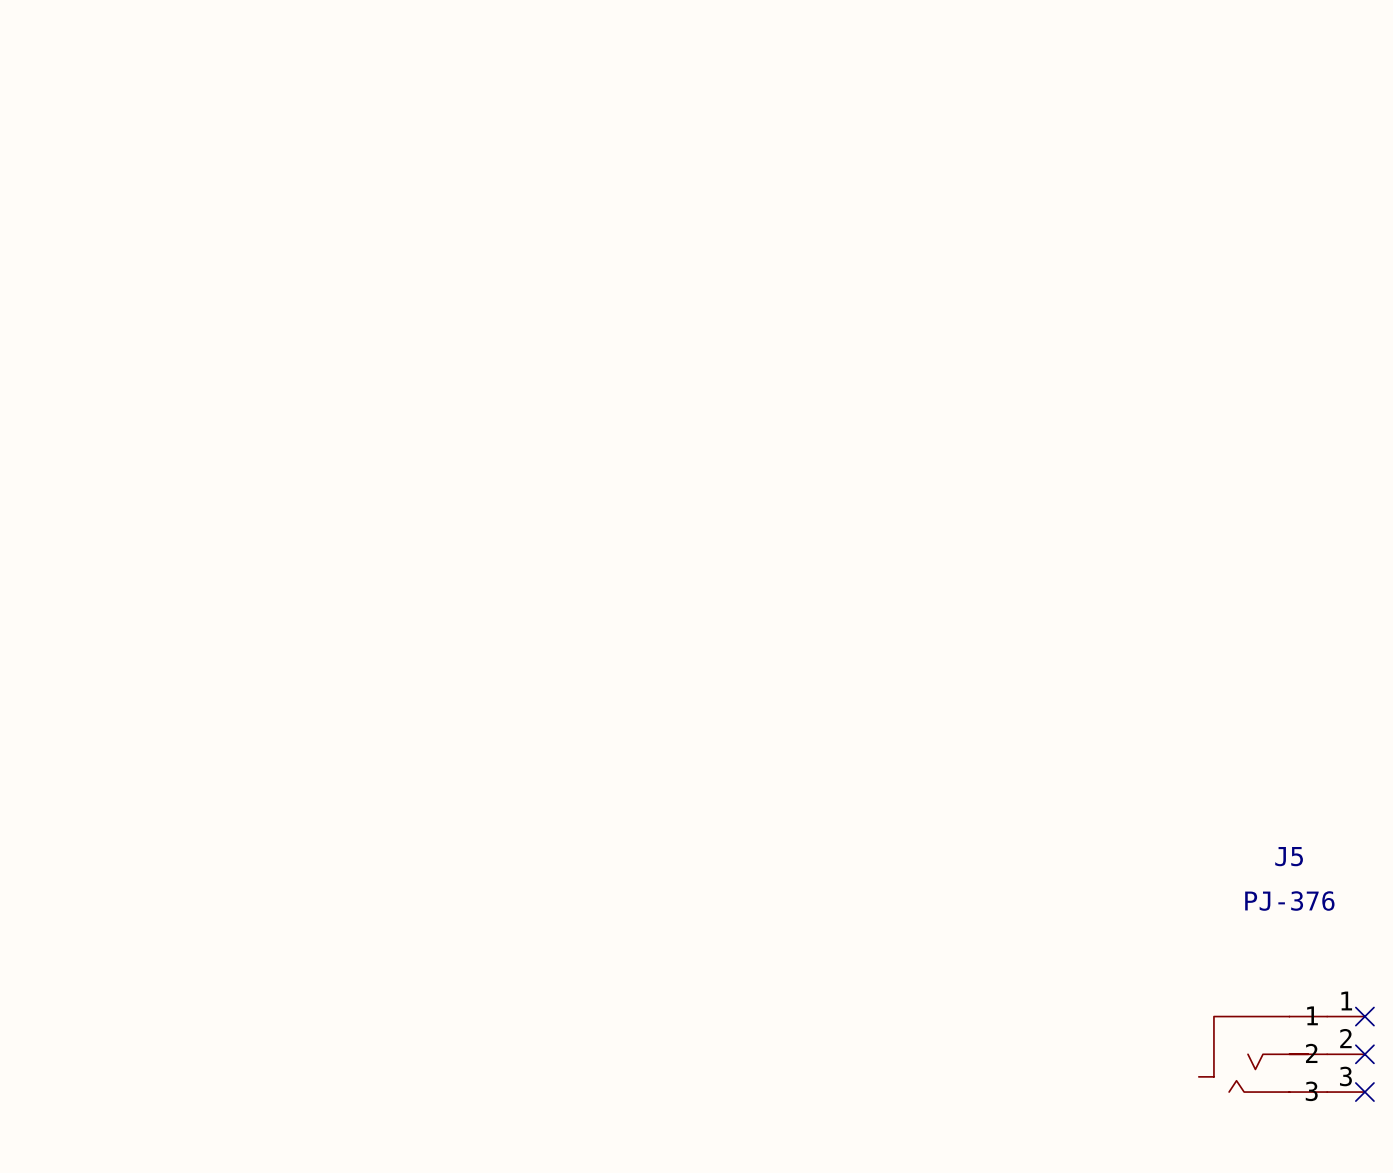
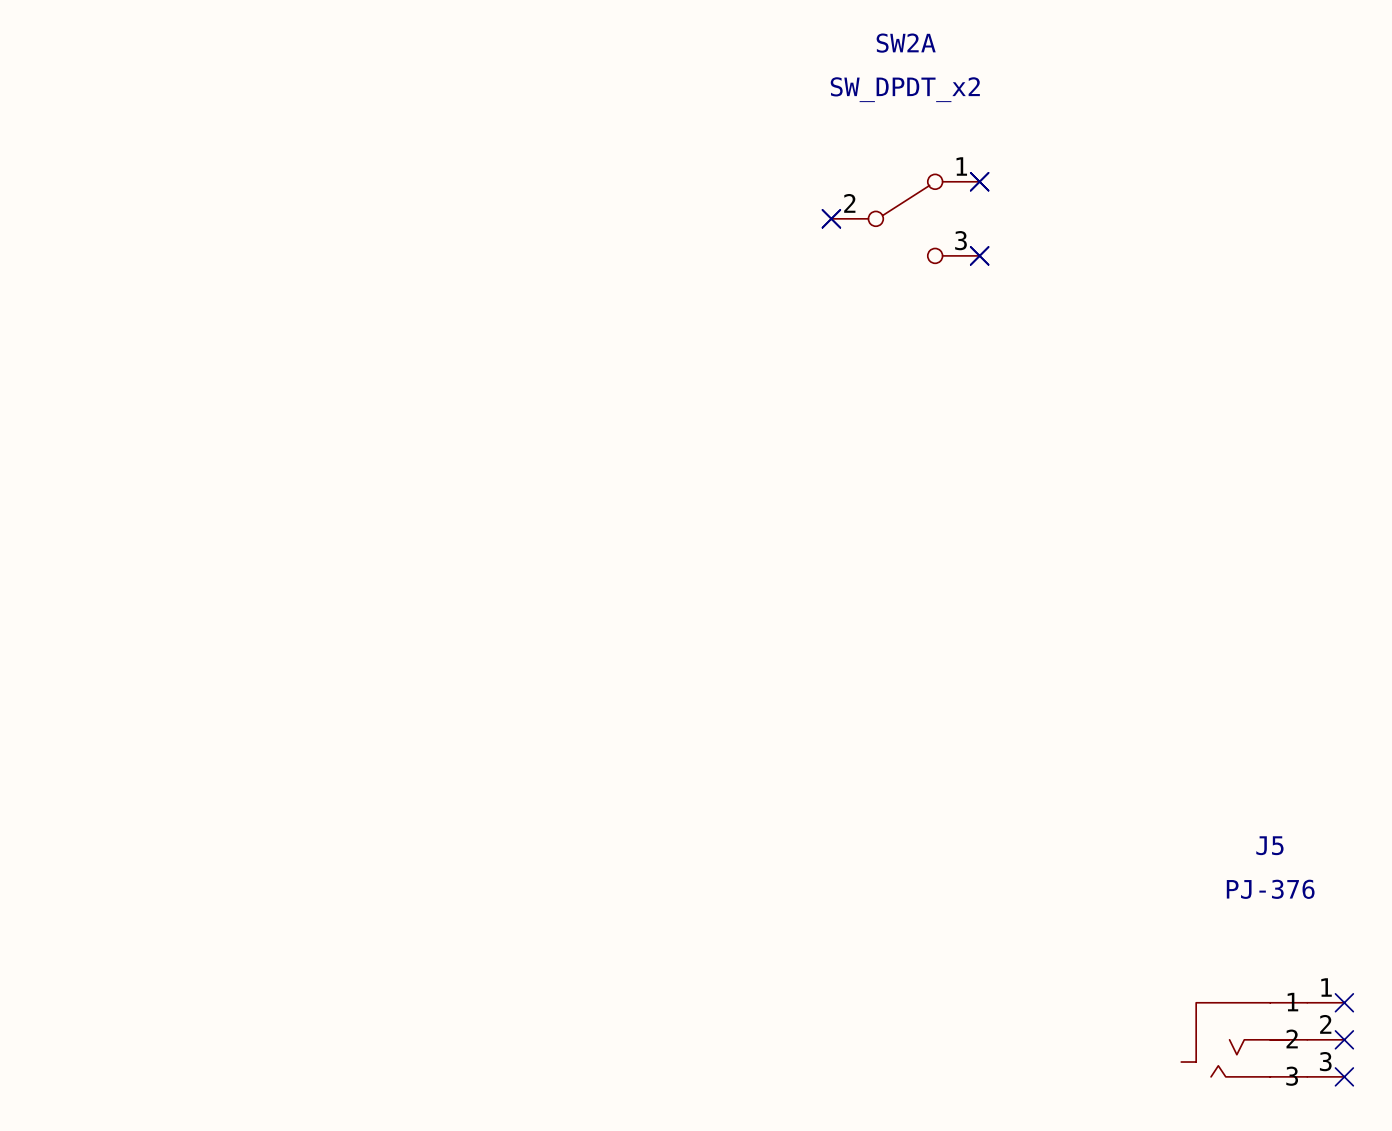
no-connect mark: none -> (979, 181)
no-connect mark: none -> (831, 218)
SW2A: none -> SW_DPDT_x2 (905, 218)
no-connect mark: none -> (979, 255)

